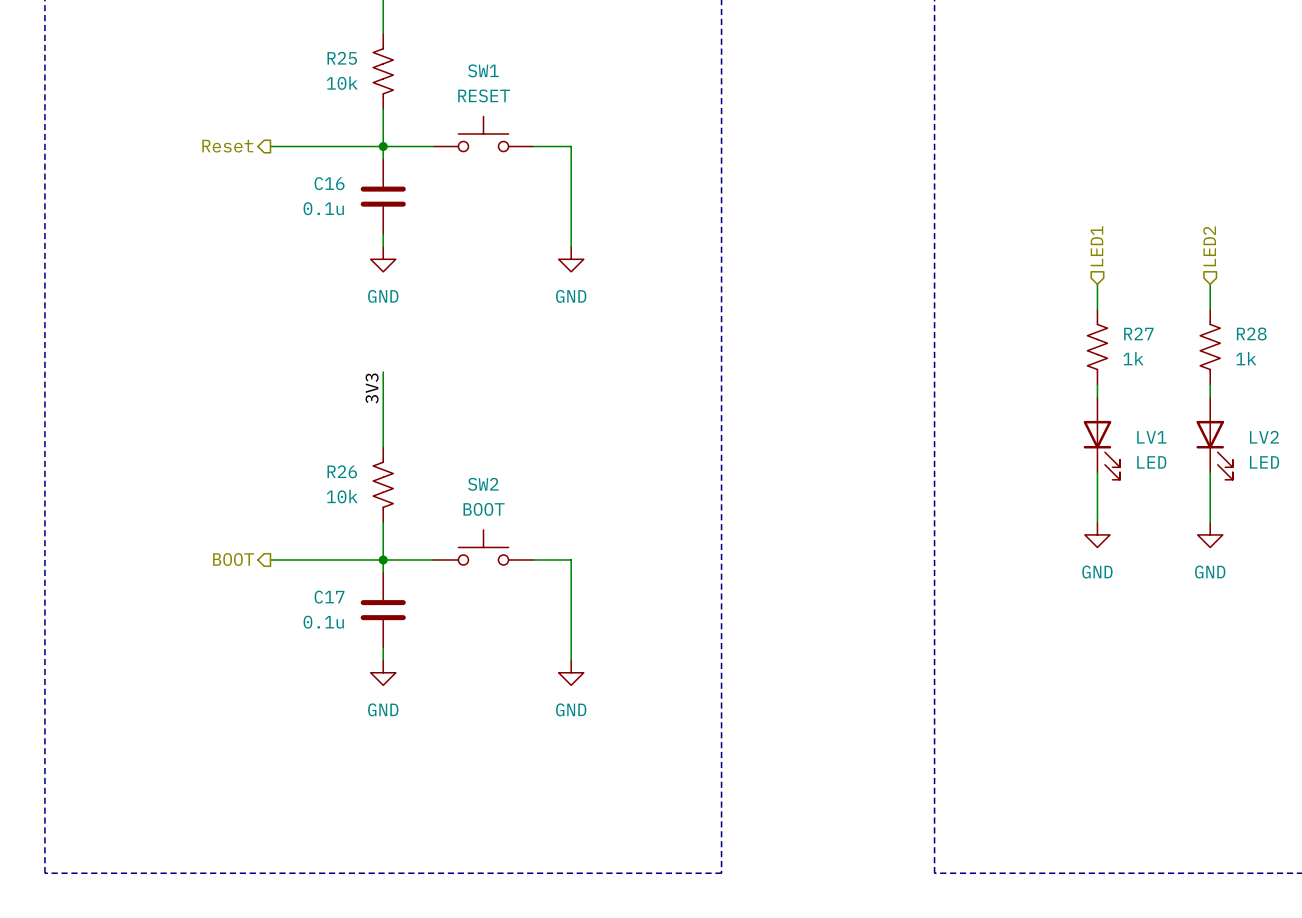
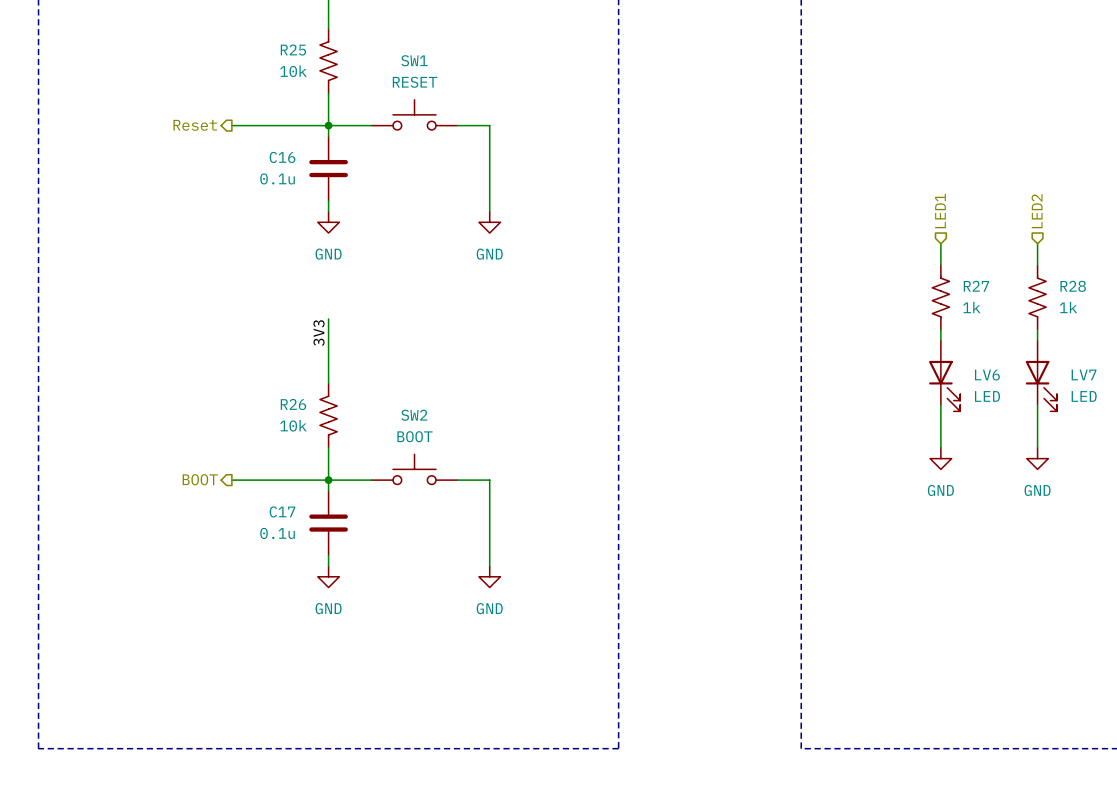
LV1 name: LV1 (1151, 437) -> LV6 (987, 375)
LV2 name: LV2 (1264, 437) -> LV7 (1084, 374)

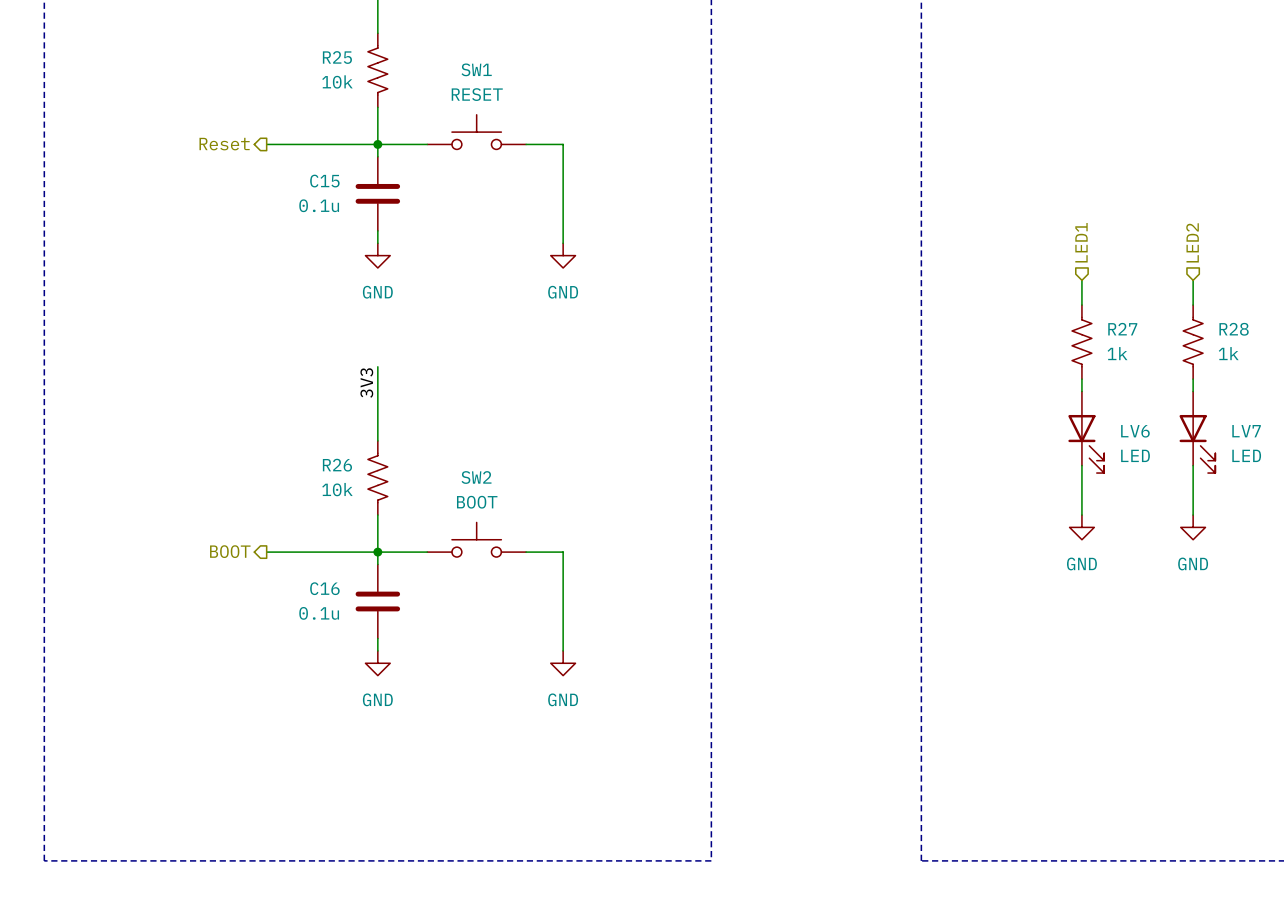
C16 name: C16 (282, 157) -> C15 (324, 181)
C17 name: C17 (282, 511) -> C16 (324, 588)

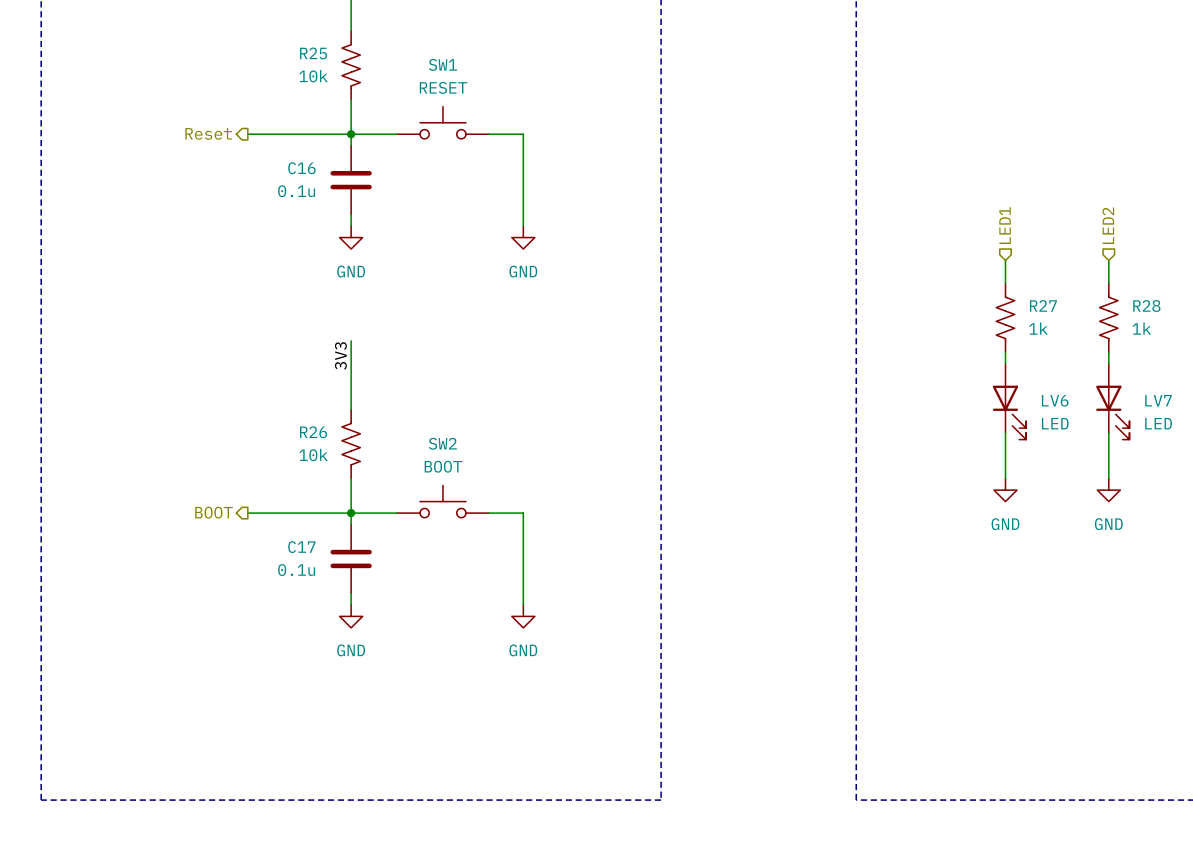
C15 name: C15 (324, 181) -> C16 (301, 168)
C16 name: C16 (324, 588) -> C17 (301, 547)

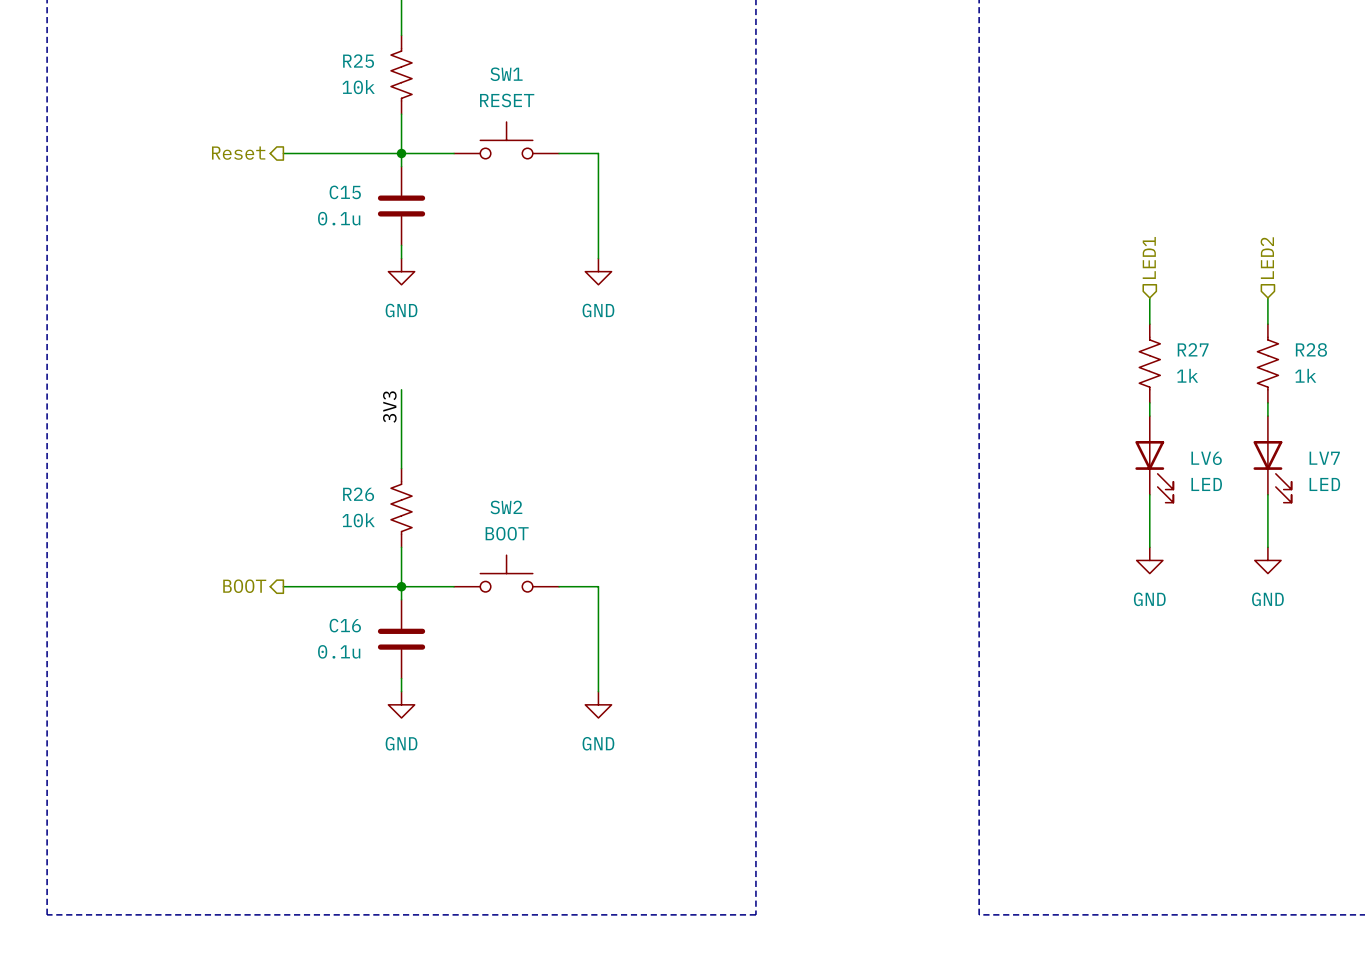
C16 name: C16 (301, 168) -> C15 (345, 192)
C17 name: C17 (301, 547) -> C16 (345, 625)

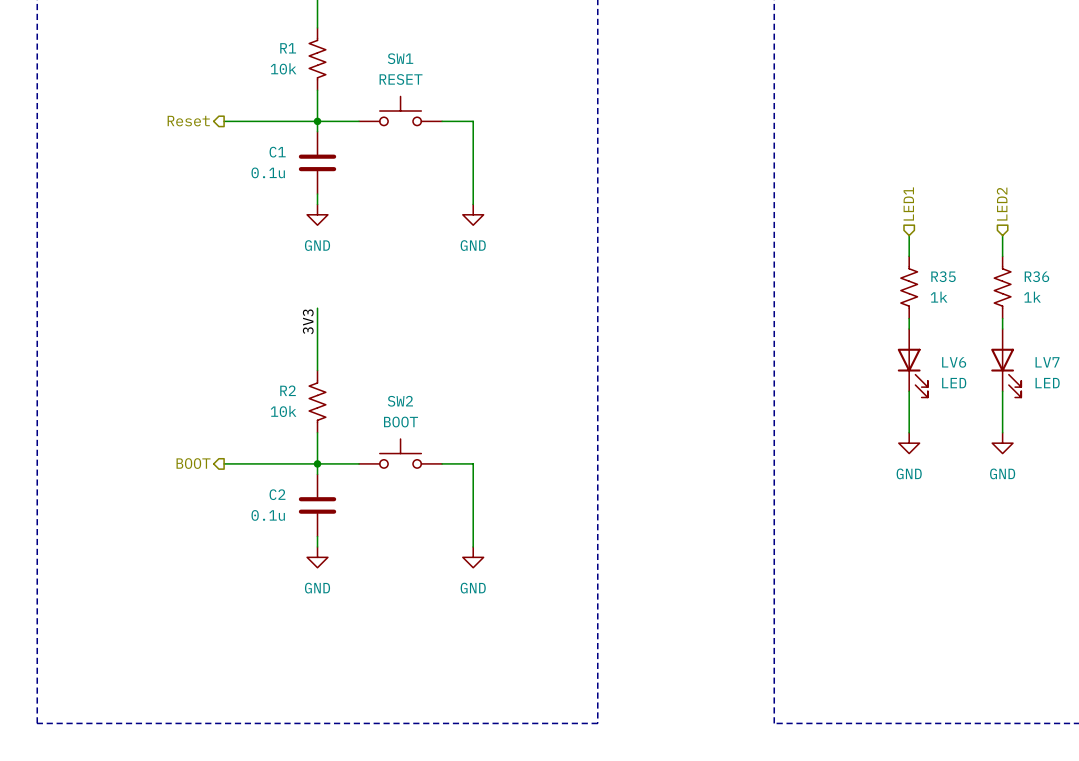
R25 name: R25 (358, 61) -> R1 (288, 48)
C15 name: C15 (345, 192) -> C1 (277, 152)
R27 name: R27 (1193, 349) -> R35 (943, 276)
R28 name: R28 (1311, 349) -> R36 (1036, 276)
R26 name: R26 (358, 494) -> R2 (288, 390)
C16 name: C16 (345, 625) -> C2 (277, 494)

